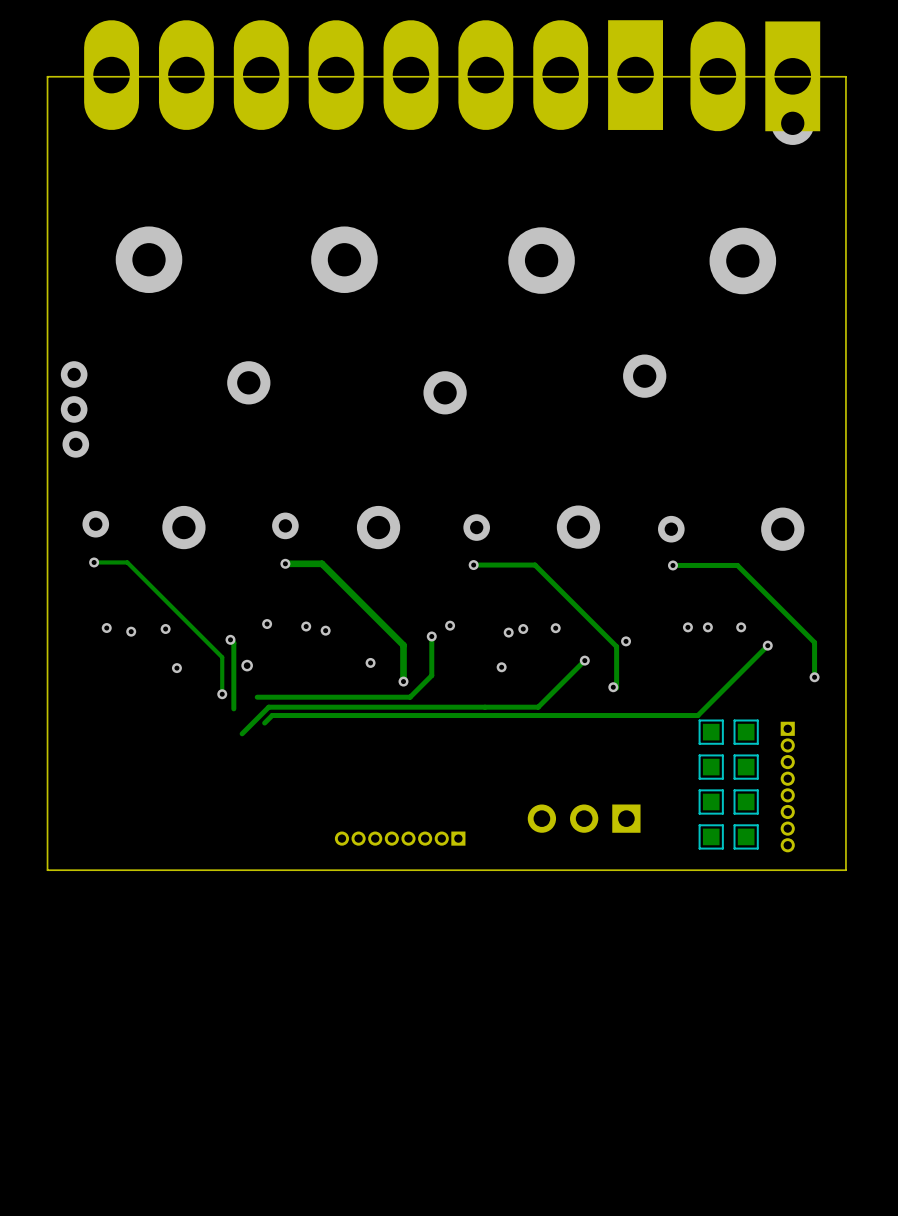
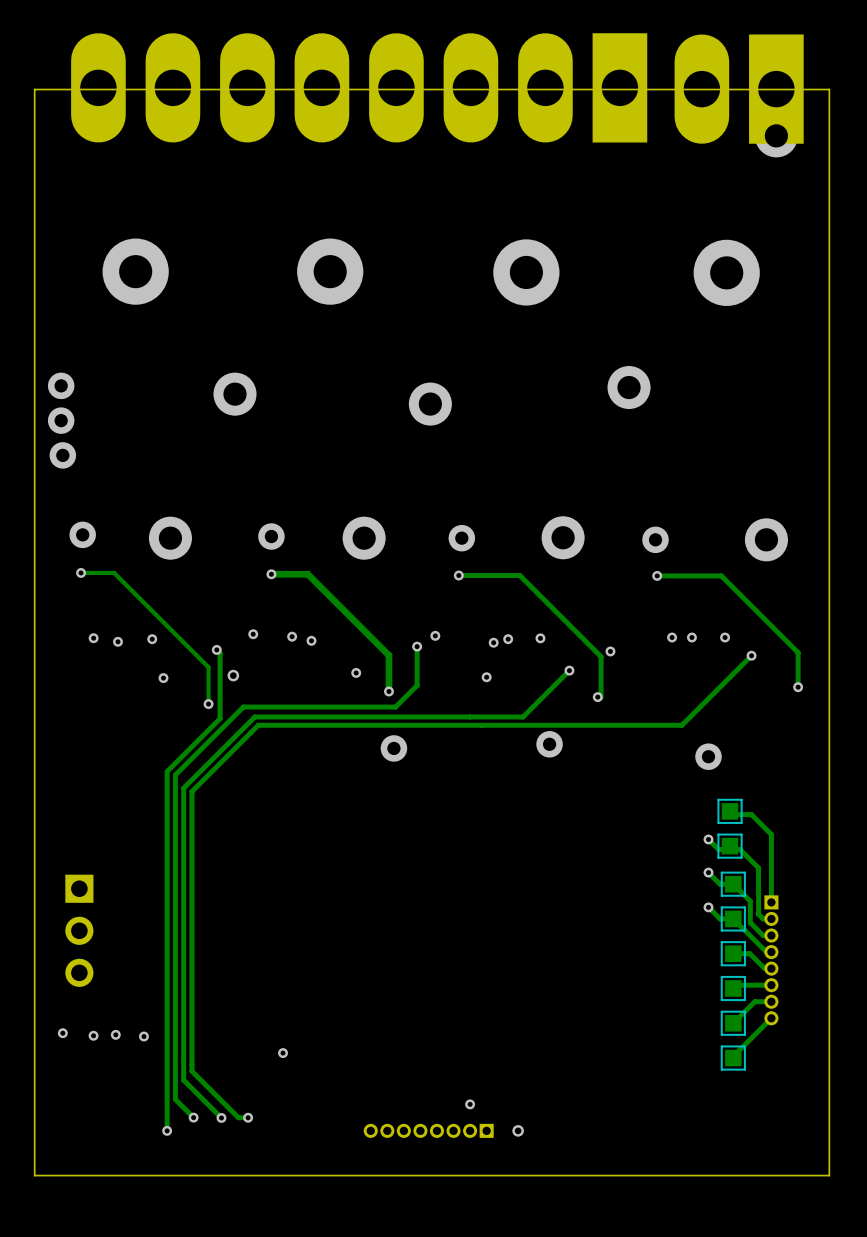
track: none -> (243, 707) (175, 775) (175, 1099) (193, 1117)
track: none -> (220, 718) (167, 771) (167, 1130)
track: none -> (250, 732) (191, 791) (191, 1071) (238, 1117) (248, 1117)
part: (711, 732) -> none
part: (746, 732) -> none
track: none -> (228, 743) (183, 788) (183, 1080) (221, 1117)
via: none -> (549, 744)
via: none -> (393, 748)
via: none -> (708, 756)
part: (711, 767) -> none
part: (746, 767) -> none
part position: (787, 787) -> (771, 960)
part: (711, 802) -> none
track: none -> (733, 814) (751, 814) (771, 834) (771, 902)
part: (584, 818) -> none
track: none -> (708, 839) (718, 849) (739, 849) (758, 868) (758, 914) (763, 918) (771, 918)
via: none -> (708, 839)
part: (711, 836) -> none
part: (400, 838) -> none
track: none -> (708, 872) (720, 884) (733, 884) (750, 901) (750, 922) (763, 935) (771, 935)
via: none -> (708, 872)
board edge: (845, 870) (47, 870) -> (829, 879) (829, 1175) (34, 1175) (34, 879)
part: none -> (733, 884)
track: none -> (708, 907) (720, 918) (733, 918) (766, 952) (771, 952)
via: none -> (708, 907)
part: none -> (733, 918)
part: none -> (79, 930)
track: none -> (733, 953) (749, 953) (764, 968) (771, 968)
part: none -> (733, 953)
track: none -> (771, 985) (736, 985) (733, 988)
part: none -> (733, 988)
track: none -> (771, 1001) (754, 1001) (733, 1023)
track: none -> (771, 1018) (733, 1058)
part: none -> (733, 1023)
via: none -> (62, 1033)
via: none -> (115, 1034)
via: none -> (93, 1035)
via: none -> (143, 1036)
via: none -> (283, 1053)
part: none -> (733, 1058)
via: none -> (470, 1104)
via: none -> (193, 1117)
via: none -> (248, 1117)
via: none -> (221, 1117)
via: none -> (167, 1130)
part: none -> (428, 1130)
via: none -> (518, 1130)

